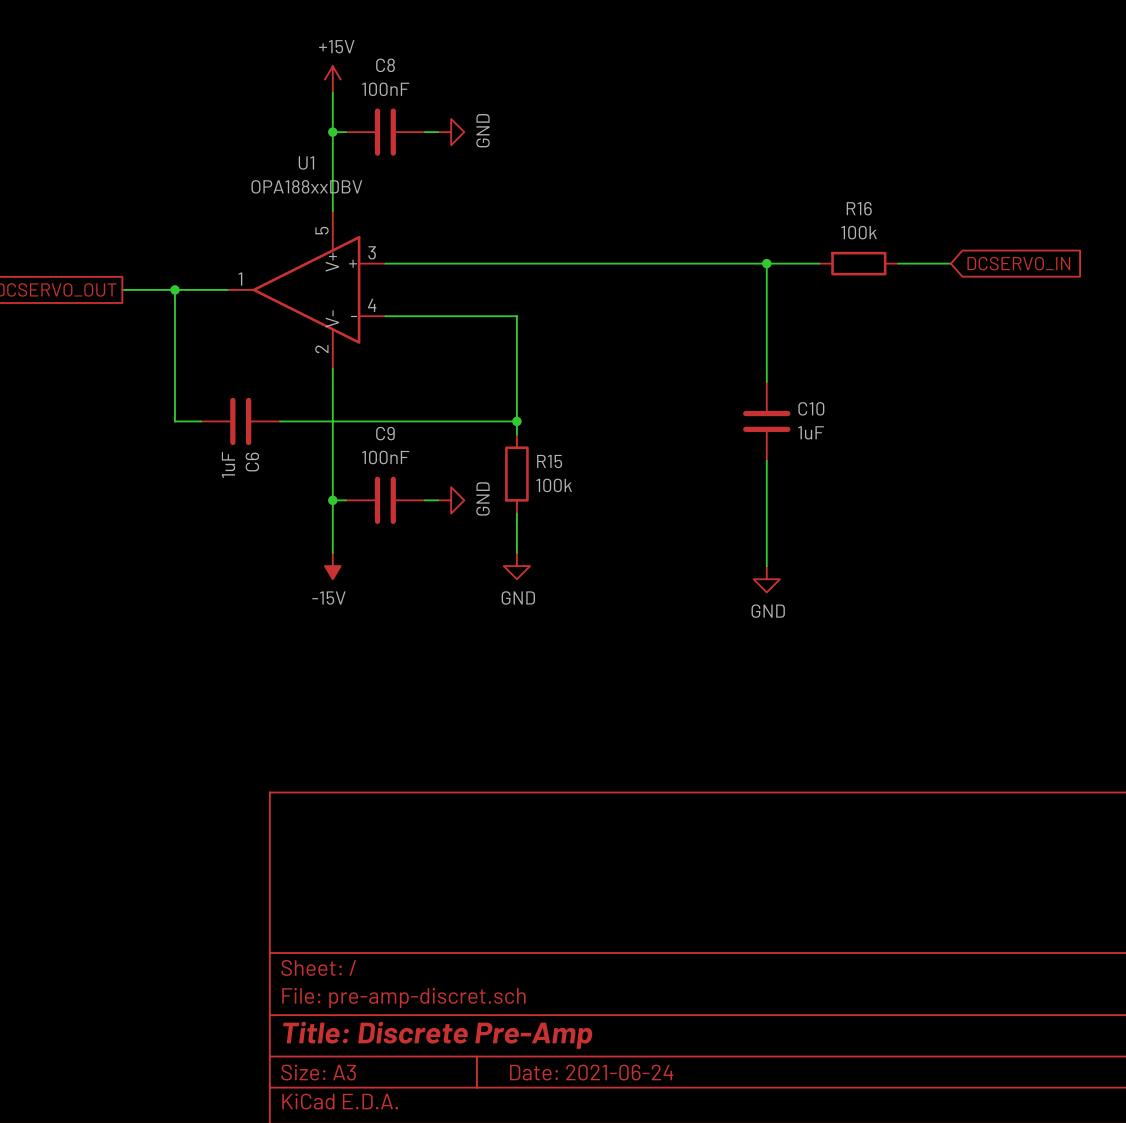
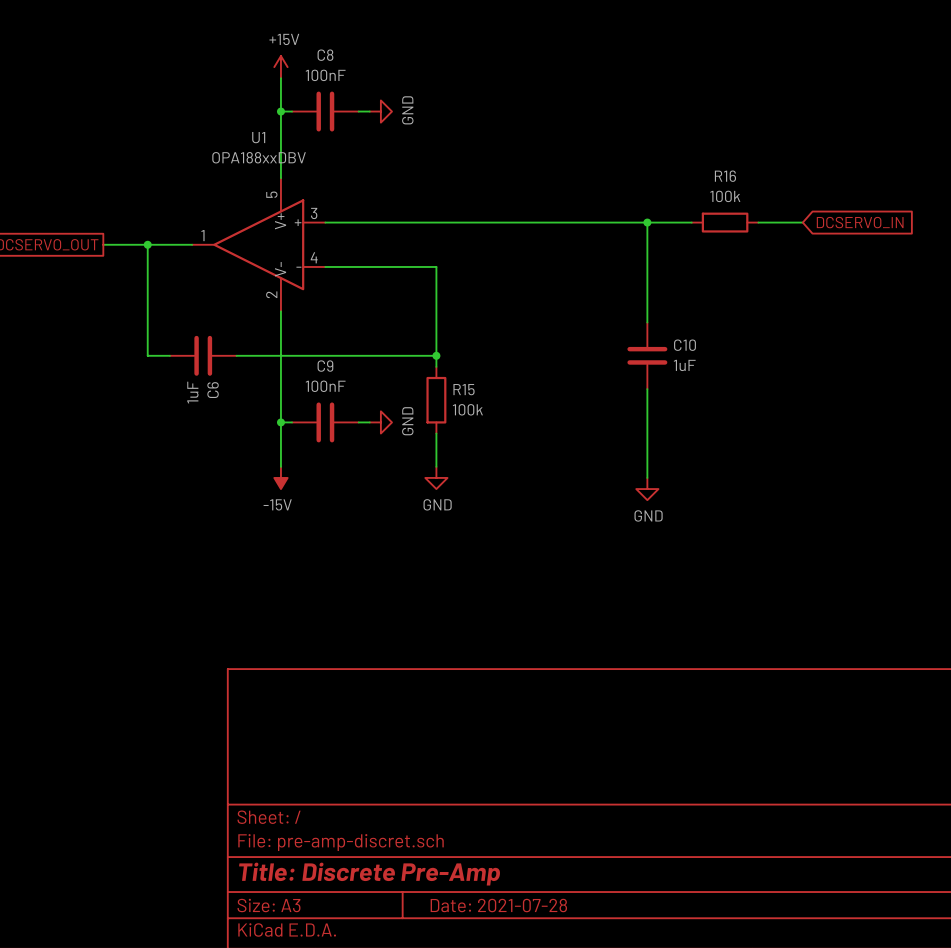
title block: Date: 2021-06-24 (591, 1072) -> Date: 2021-07-28 (498, 905)

